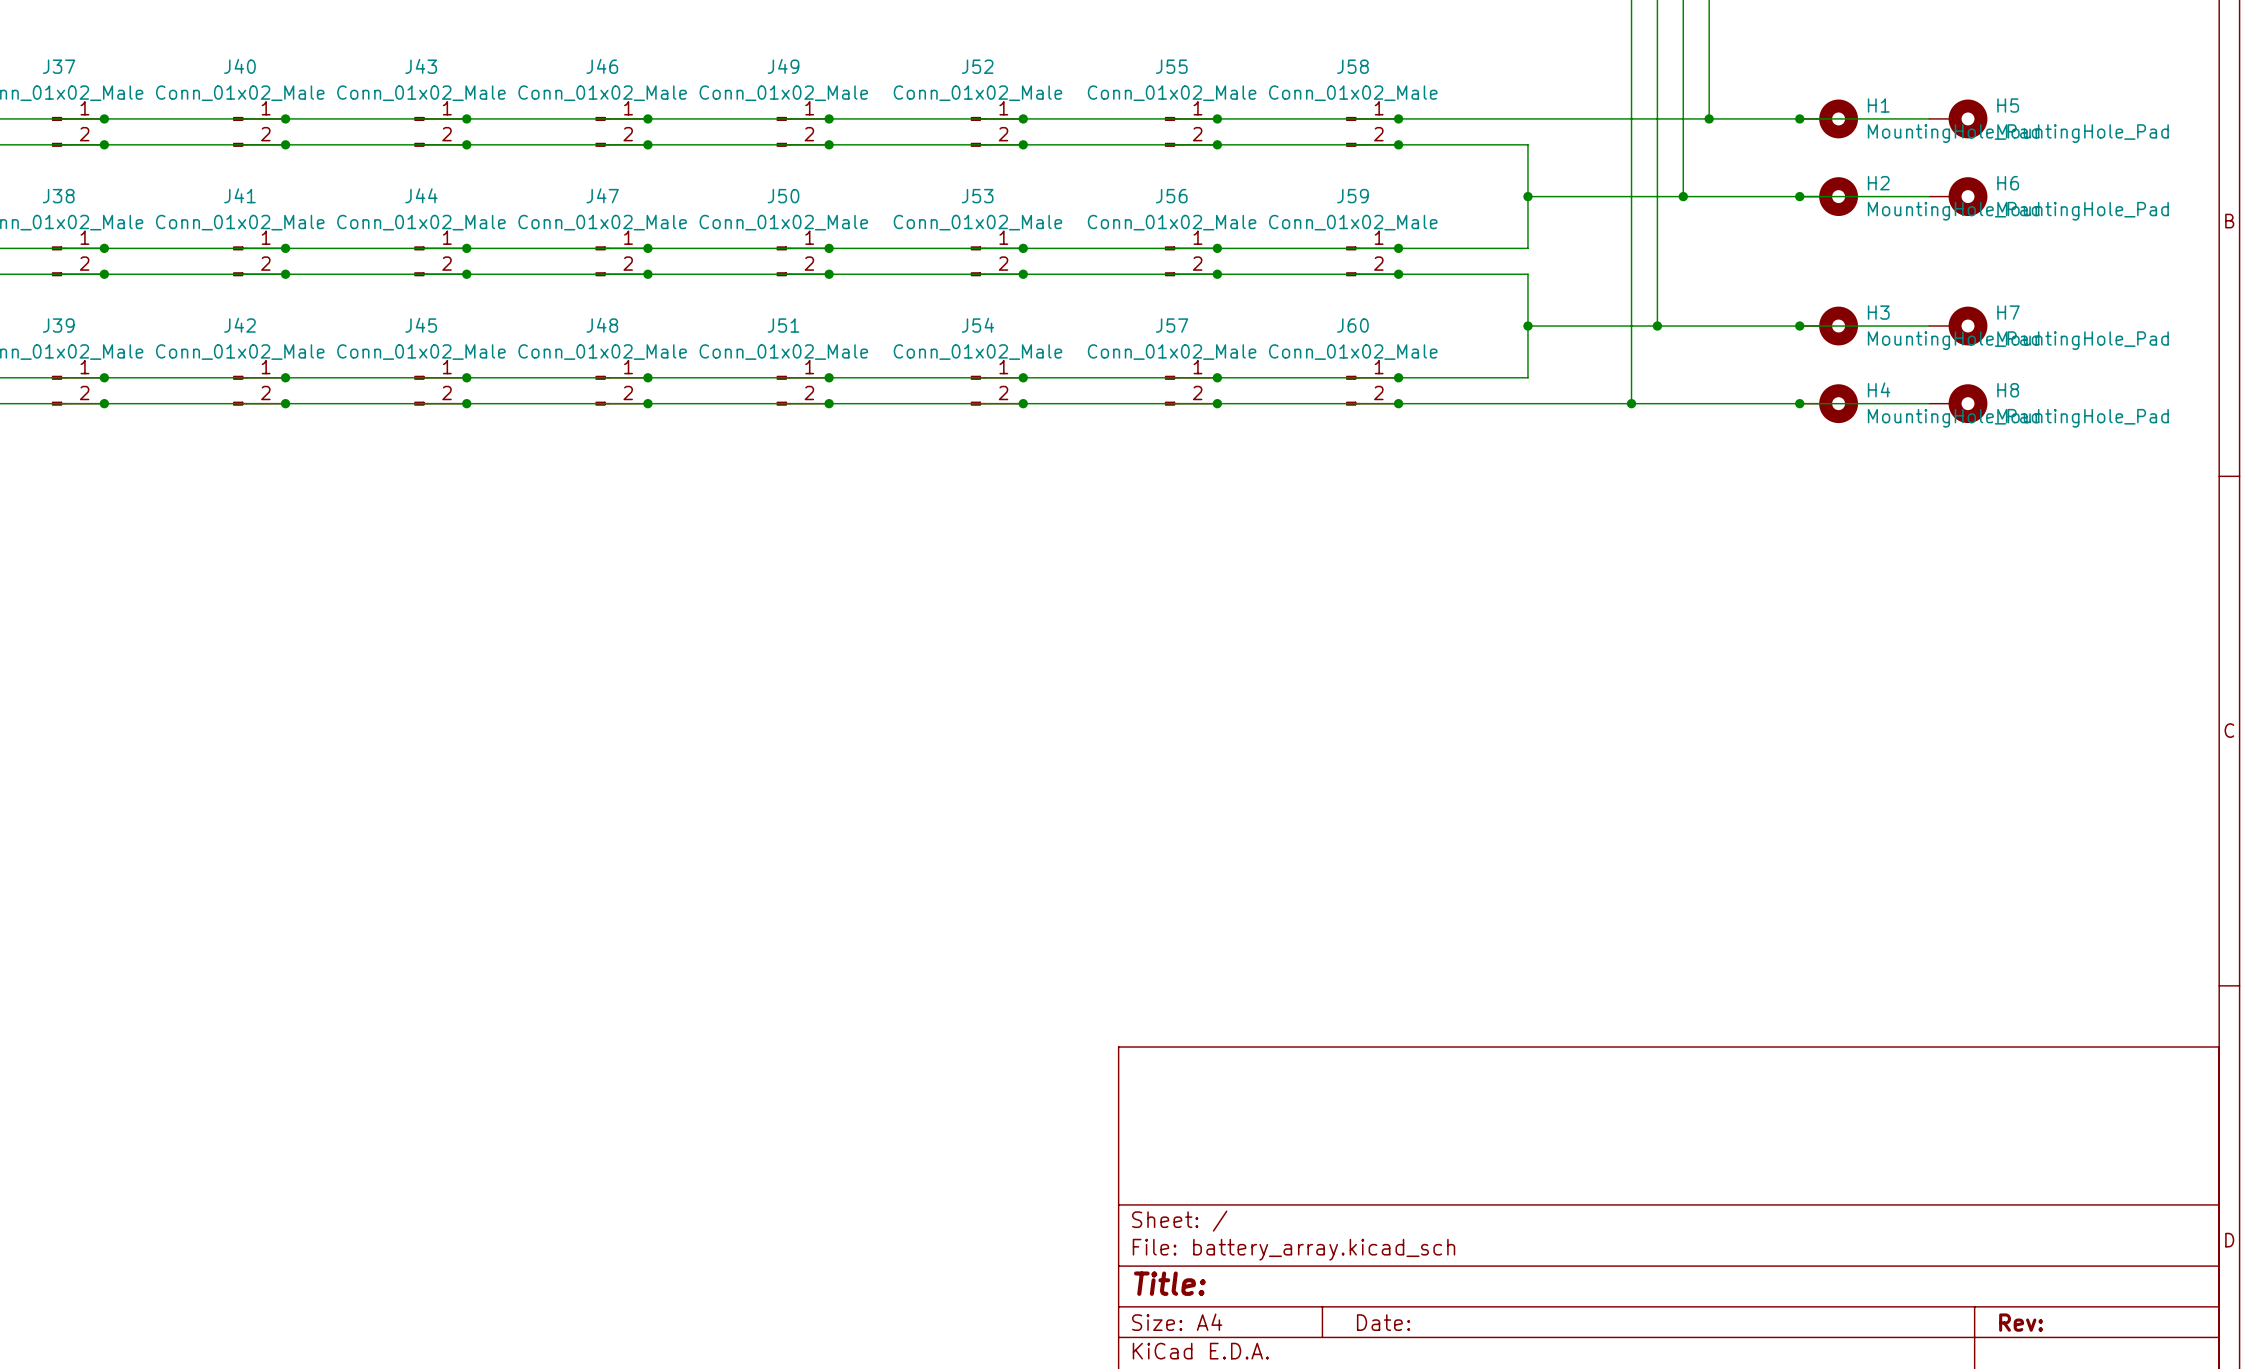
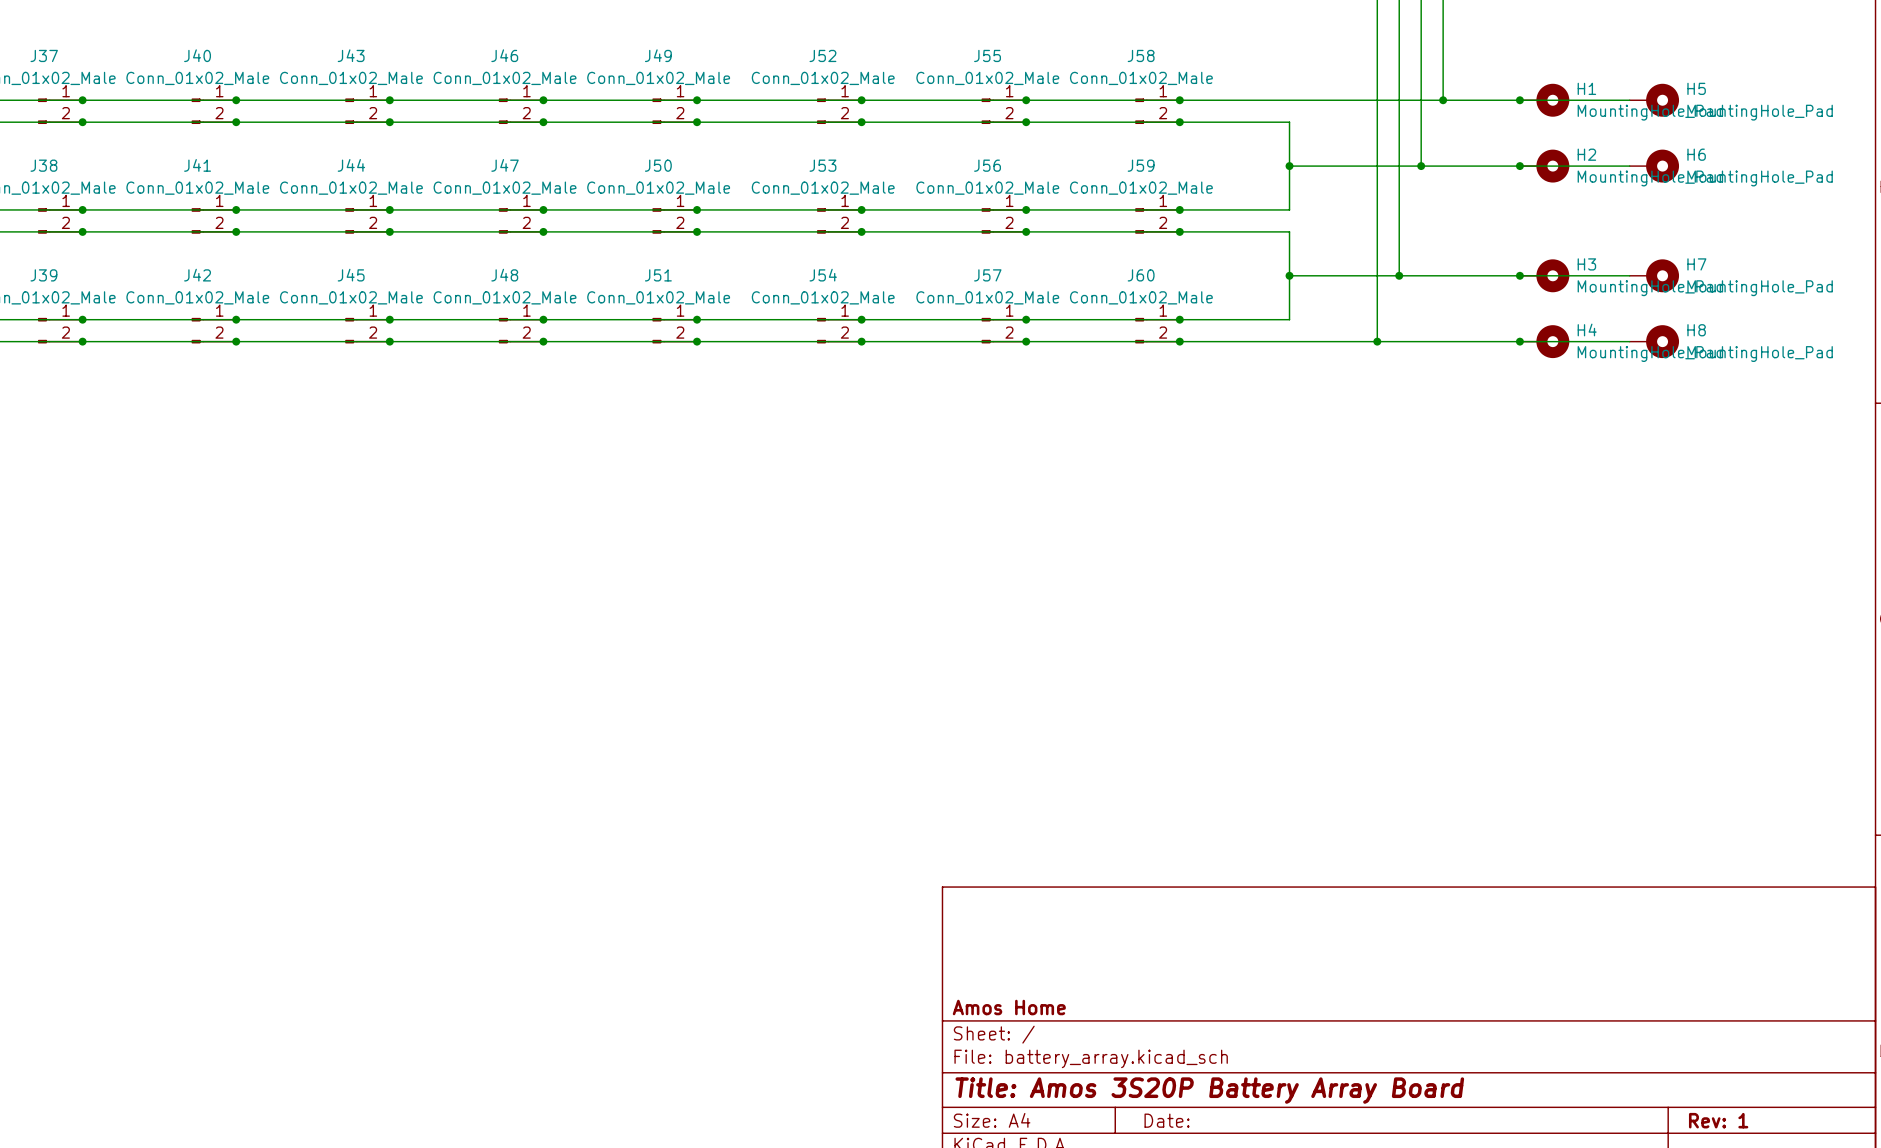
title block: none -> Amos Home (1009, 1007)
title block: Title: (1169, 1283) -> Title: Amos 3S20P Battery Array Board (1209, 1090)
title block: Rev: (2021, 1322) -> Rev: 1 (1718, 1120)

